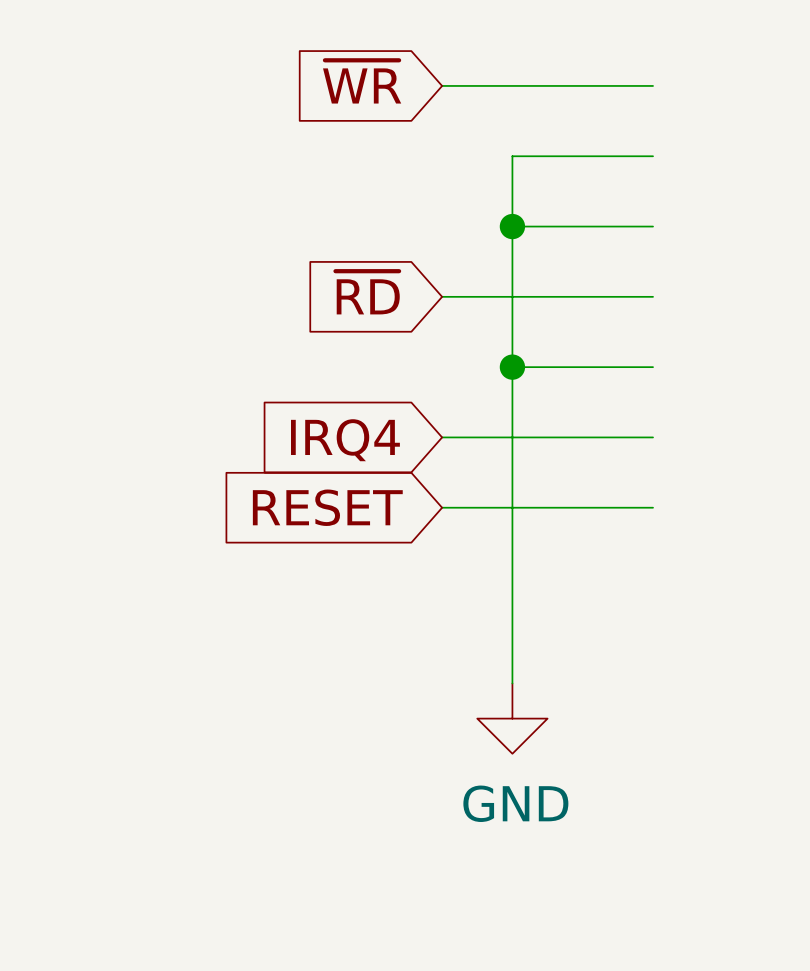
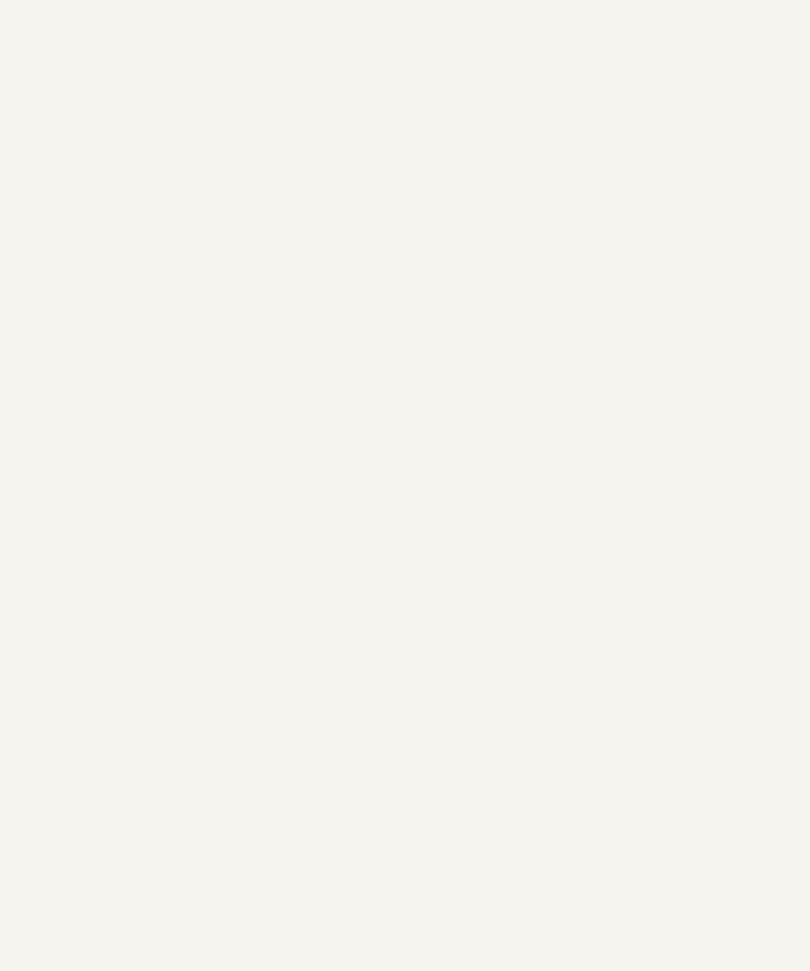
global label: ~{WR} (362, 81) -> none
wire: (442, 85) (653, 85) -> none
wire: (653, 156) (512, 156) (512, 683) -> none
wire: (512, 226) (653, 226) -> none
junction: (512, 226) -> none
global label: ~{RD} (367, 292) -> none
wire: (442, 296) (653, 296) -> none
wire: (512, 367) (653, 367) -> none
junction: (512, 367) -> none
wire: (442, 437) (653, 437) -> none
global label: IRQ4 (345, 440) -> none
global label: RESET (327, 507) -> none
wire: (442, 507) (653, 507) -> none
power symbol: GND (512, 718) -> none

